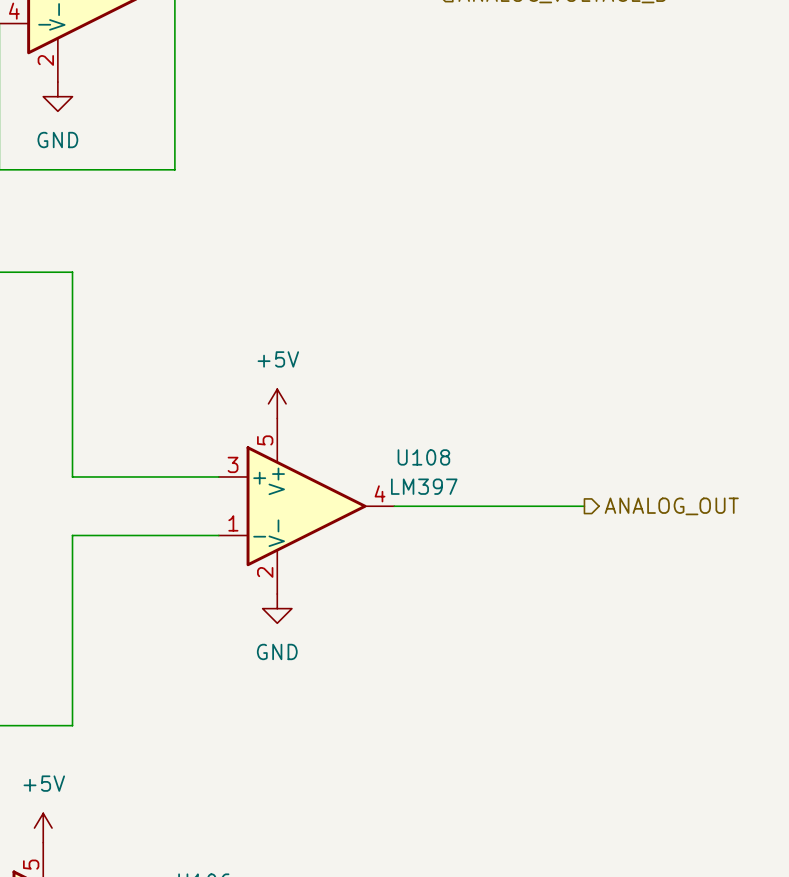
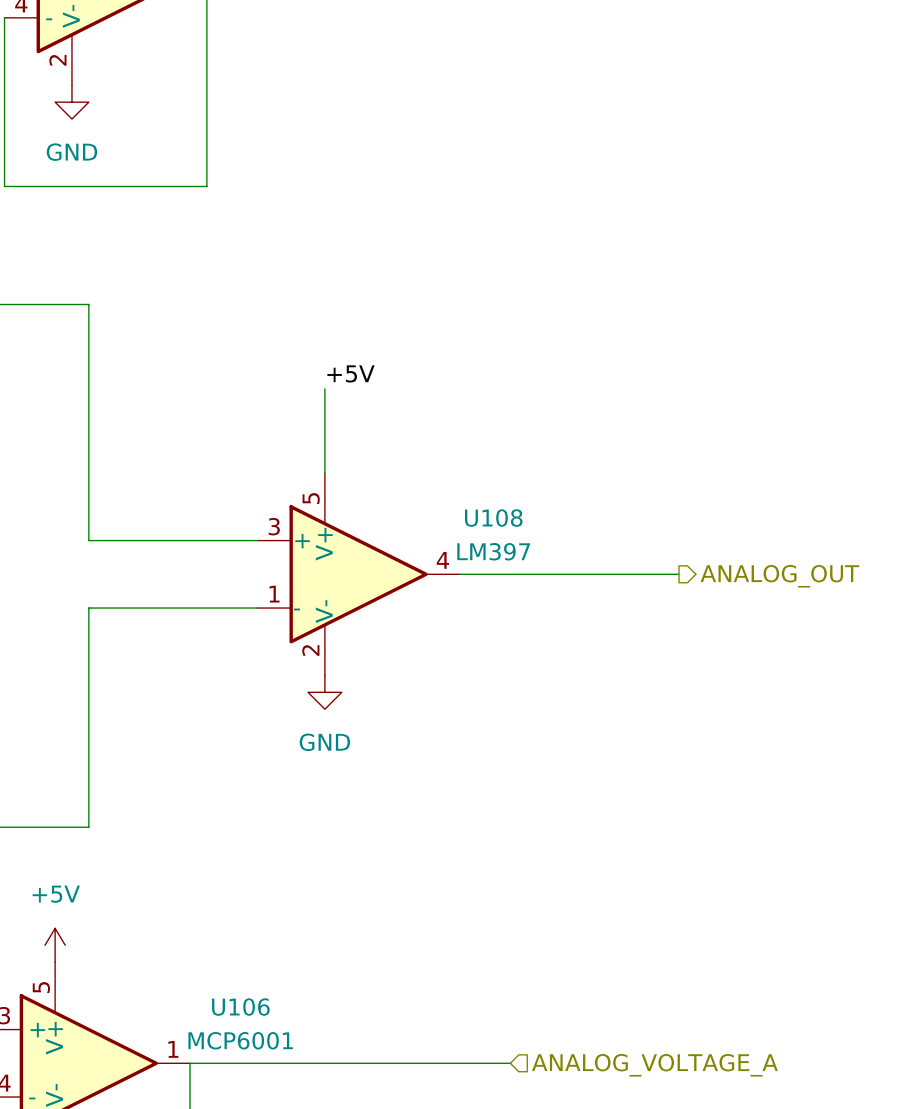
label: none -> +5V (351, 373)
wire: none -> (324, 388) (324, 473)
power symbol: +5V (277, 403) -> none

